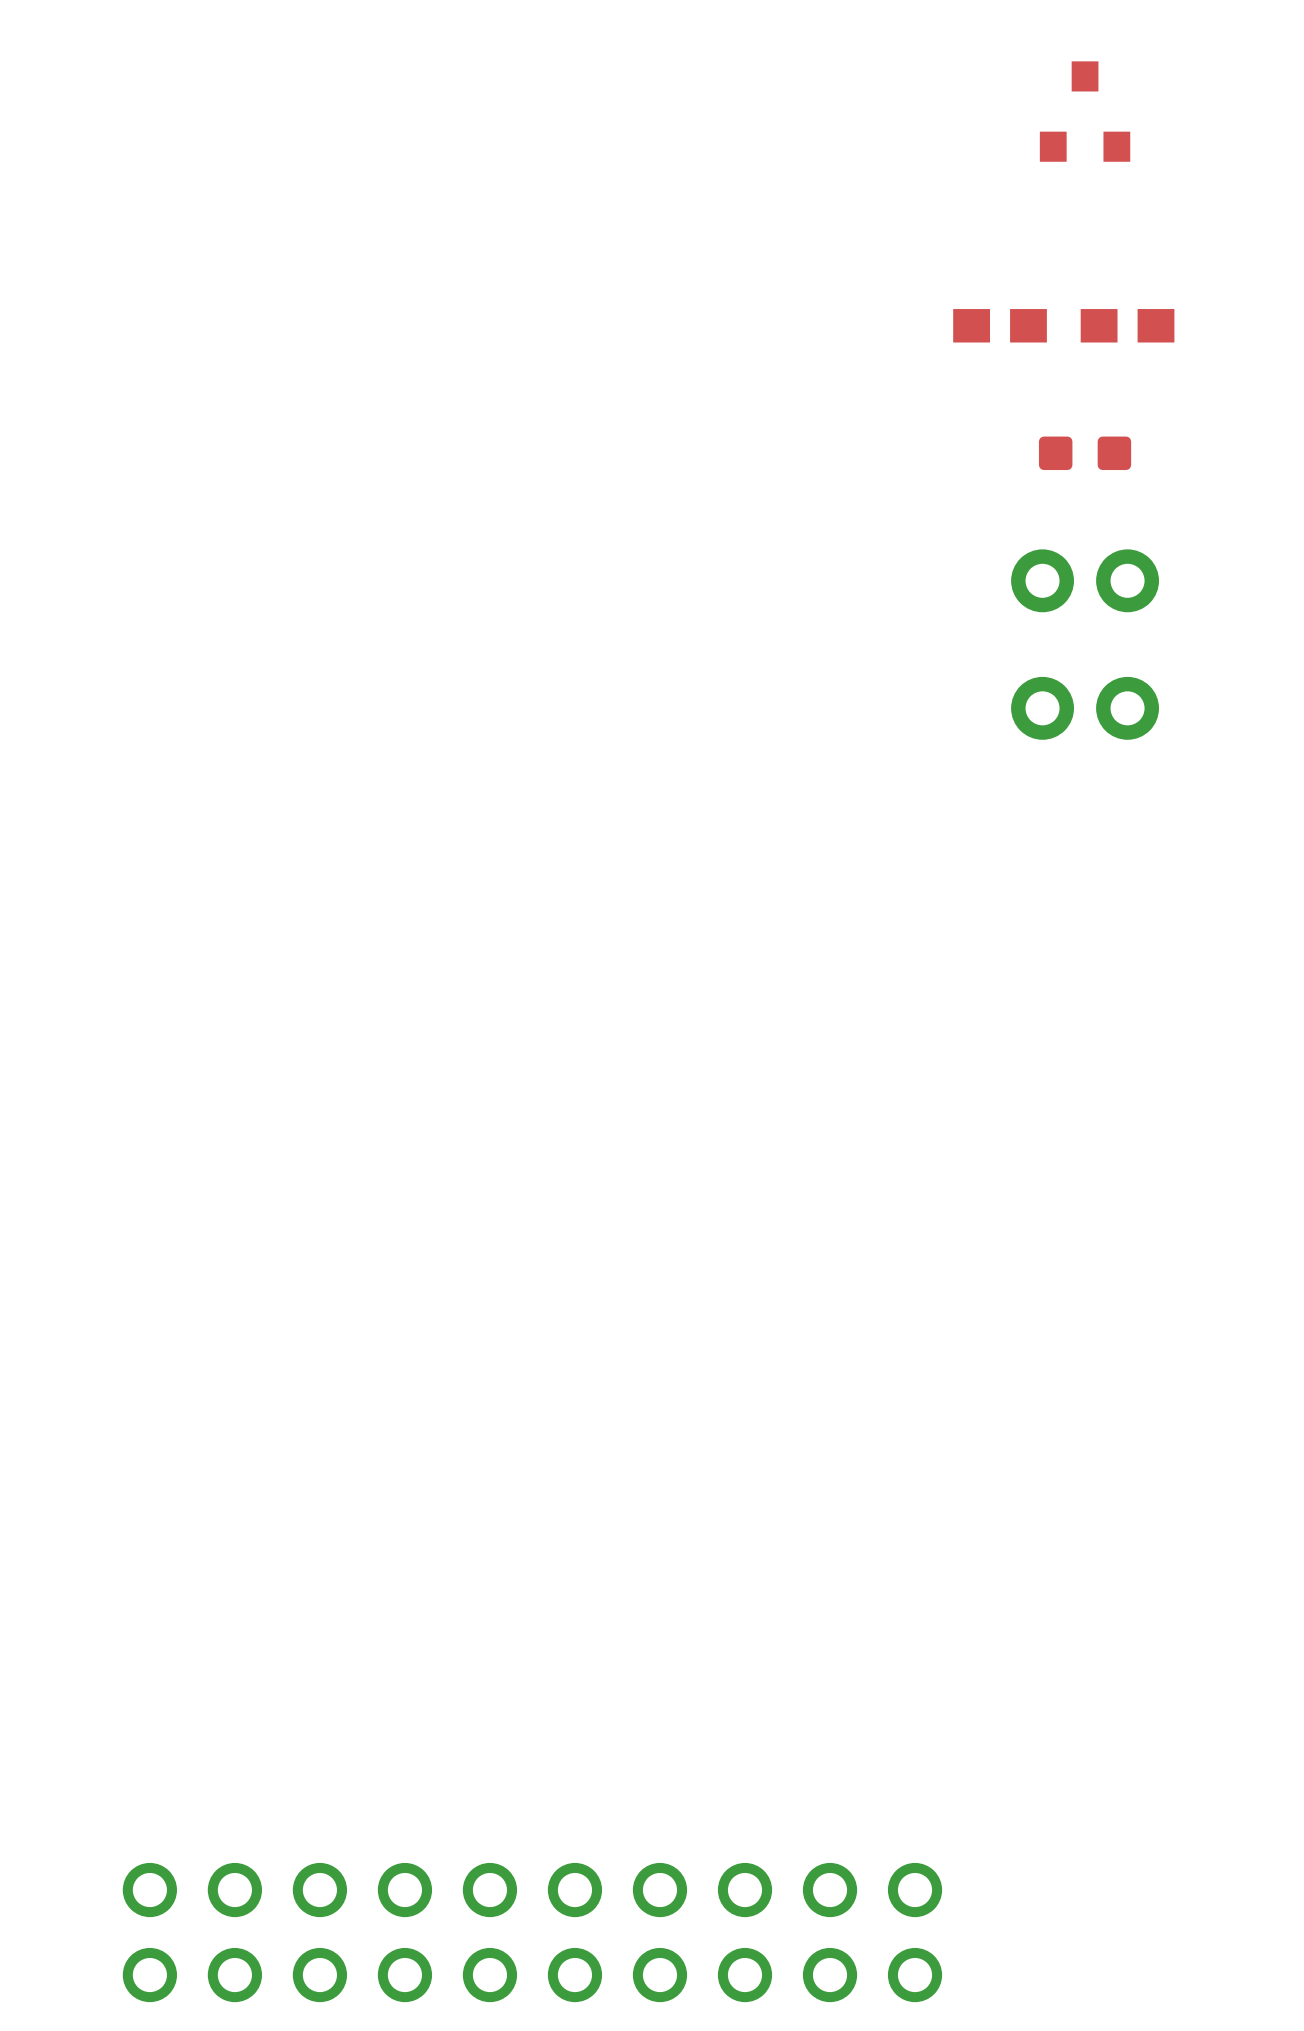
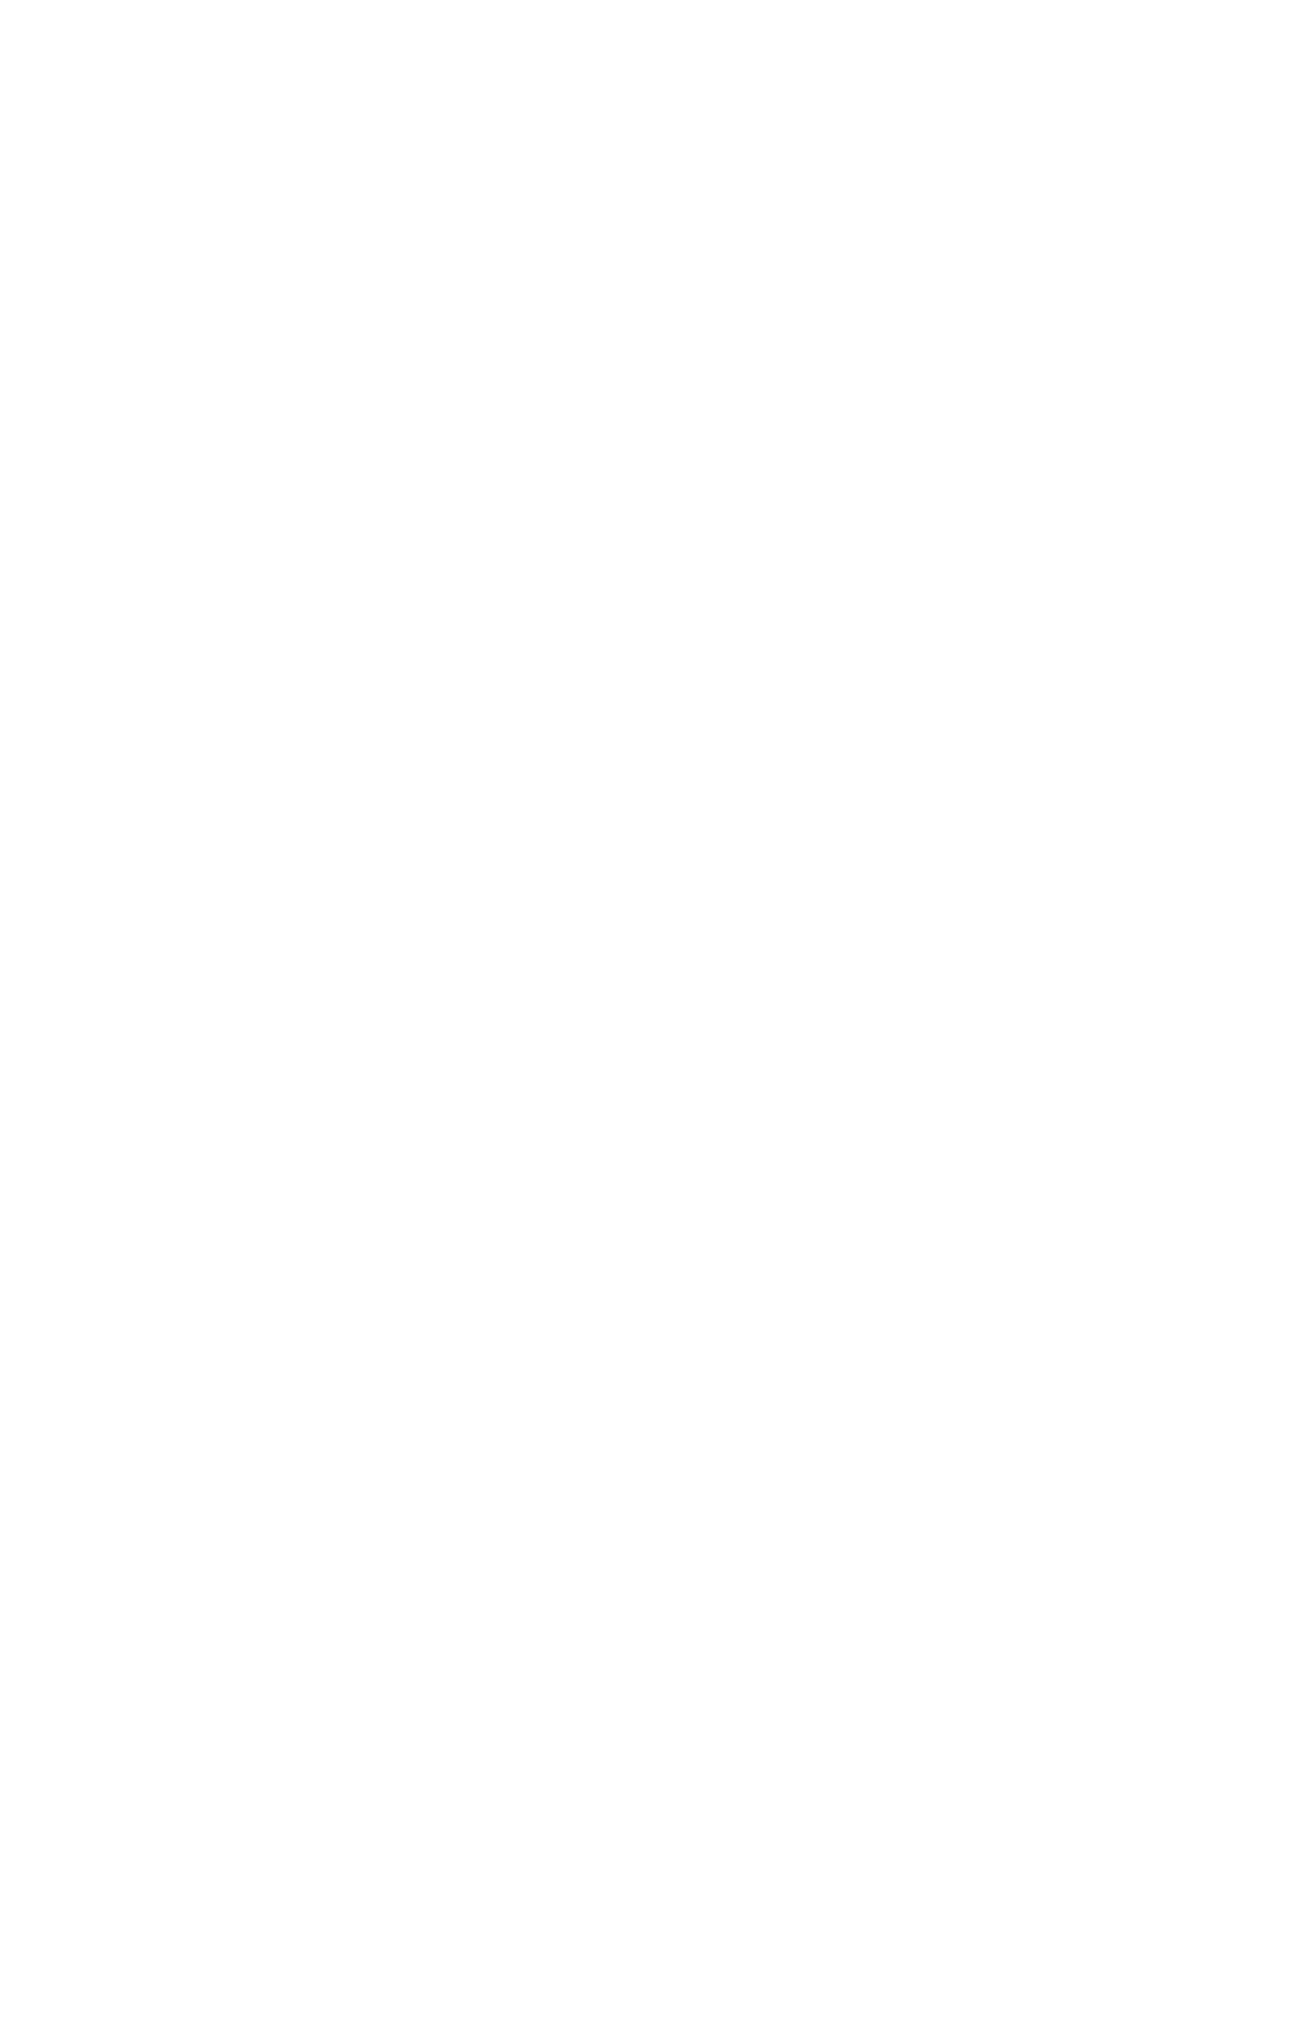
part: (1085, 111) -> none
part: (1000, 325) -> none
part: (1127, 325) -> none
part: (1085, 453) -> none
part: (1085, 580) -> none
part: (1085, 708) -> none
part: (532, 1932) -> none

